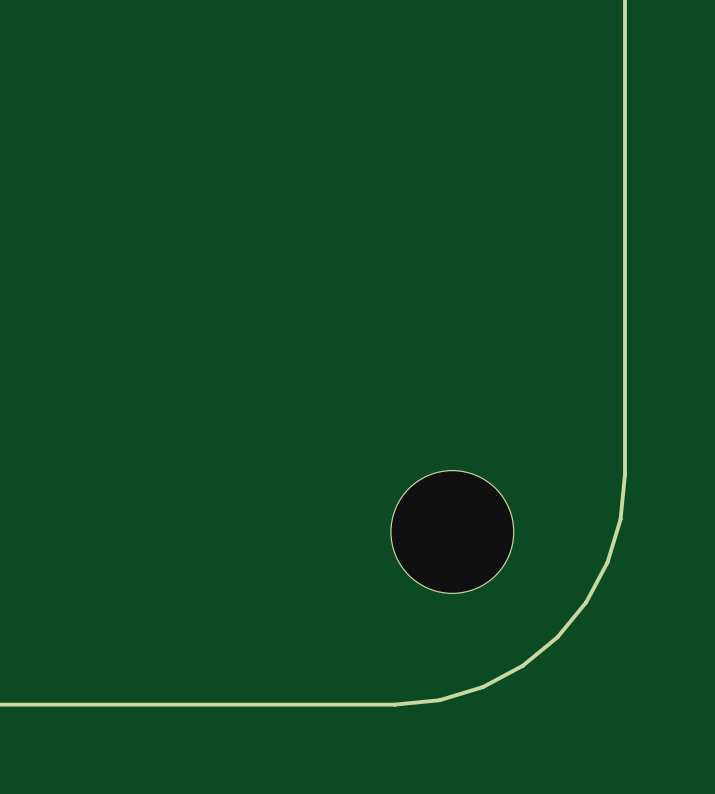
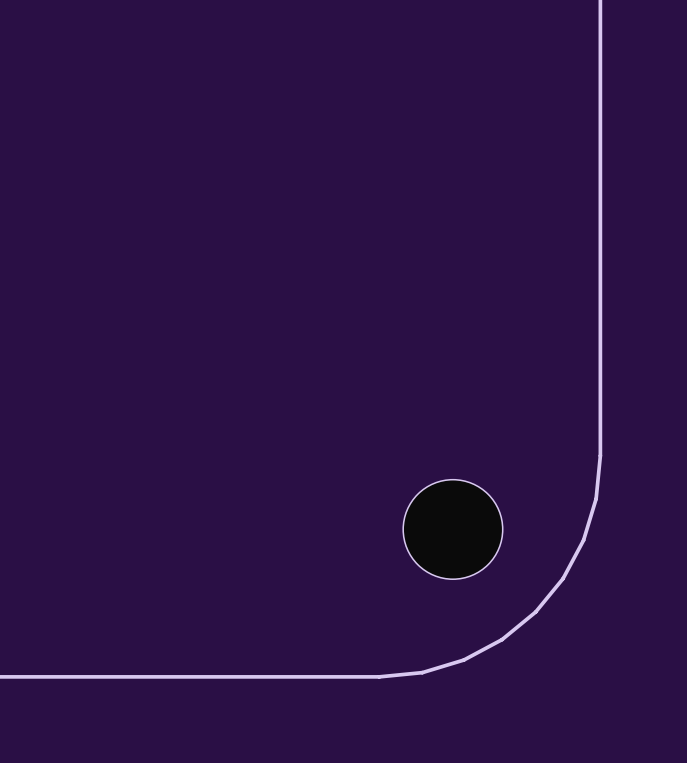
part footprint: [390, 470, 514, 594] -> [403, 479, 503, 580]

